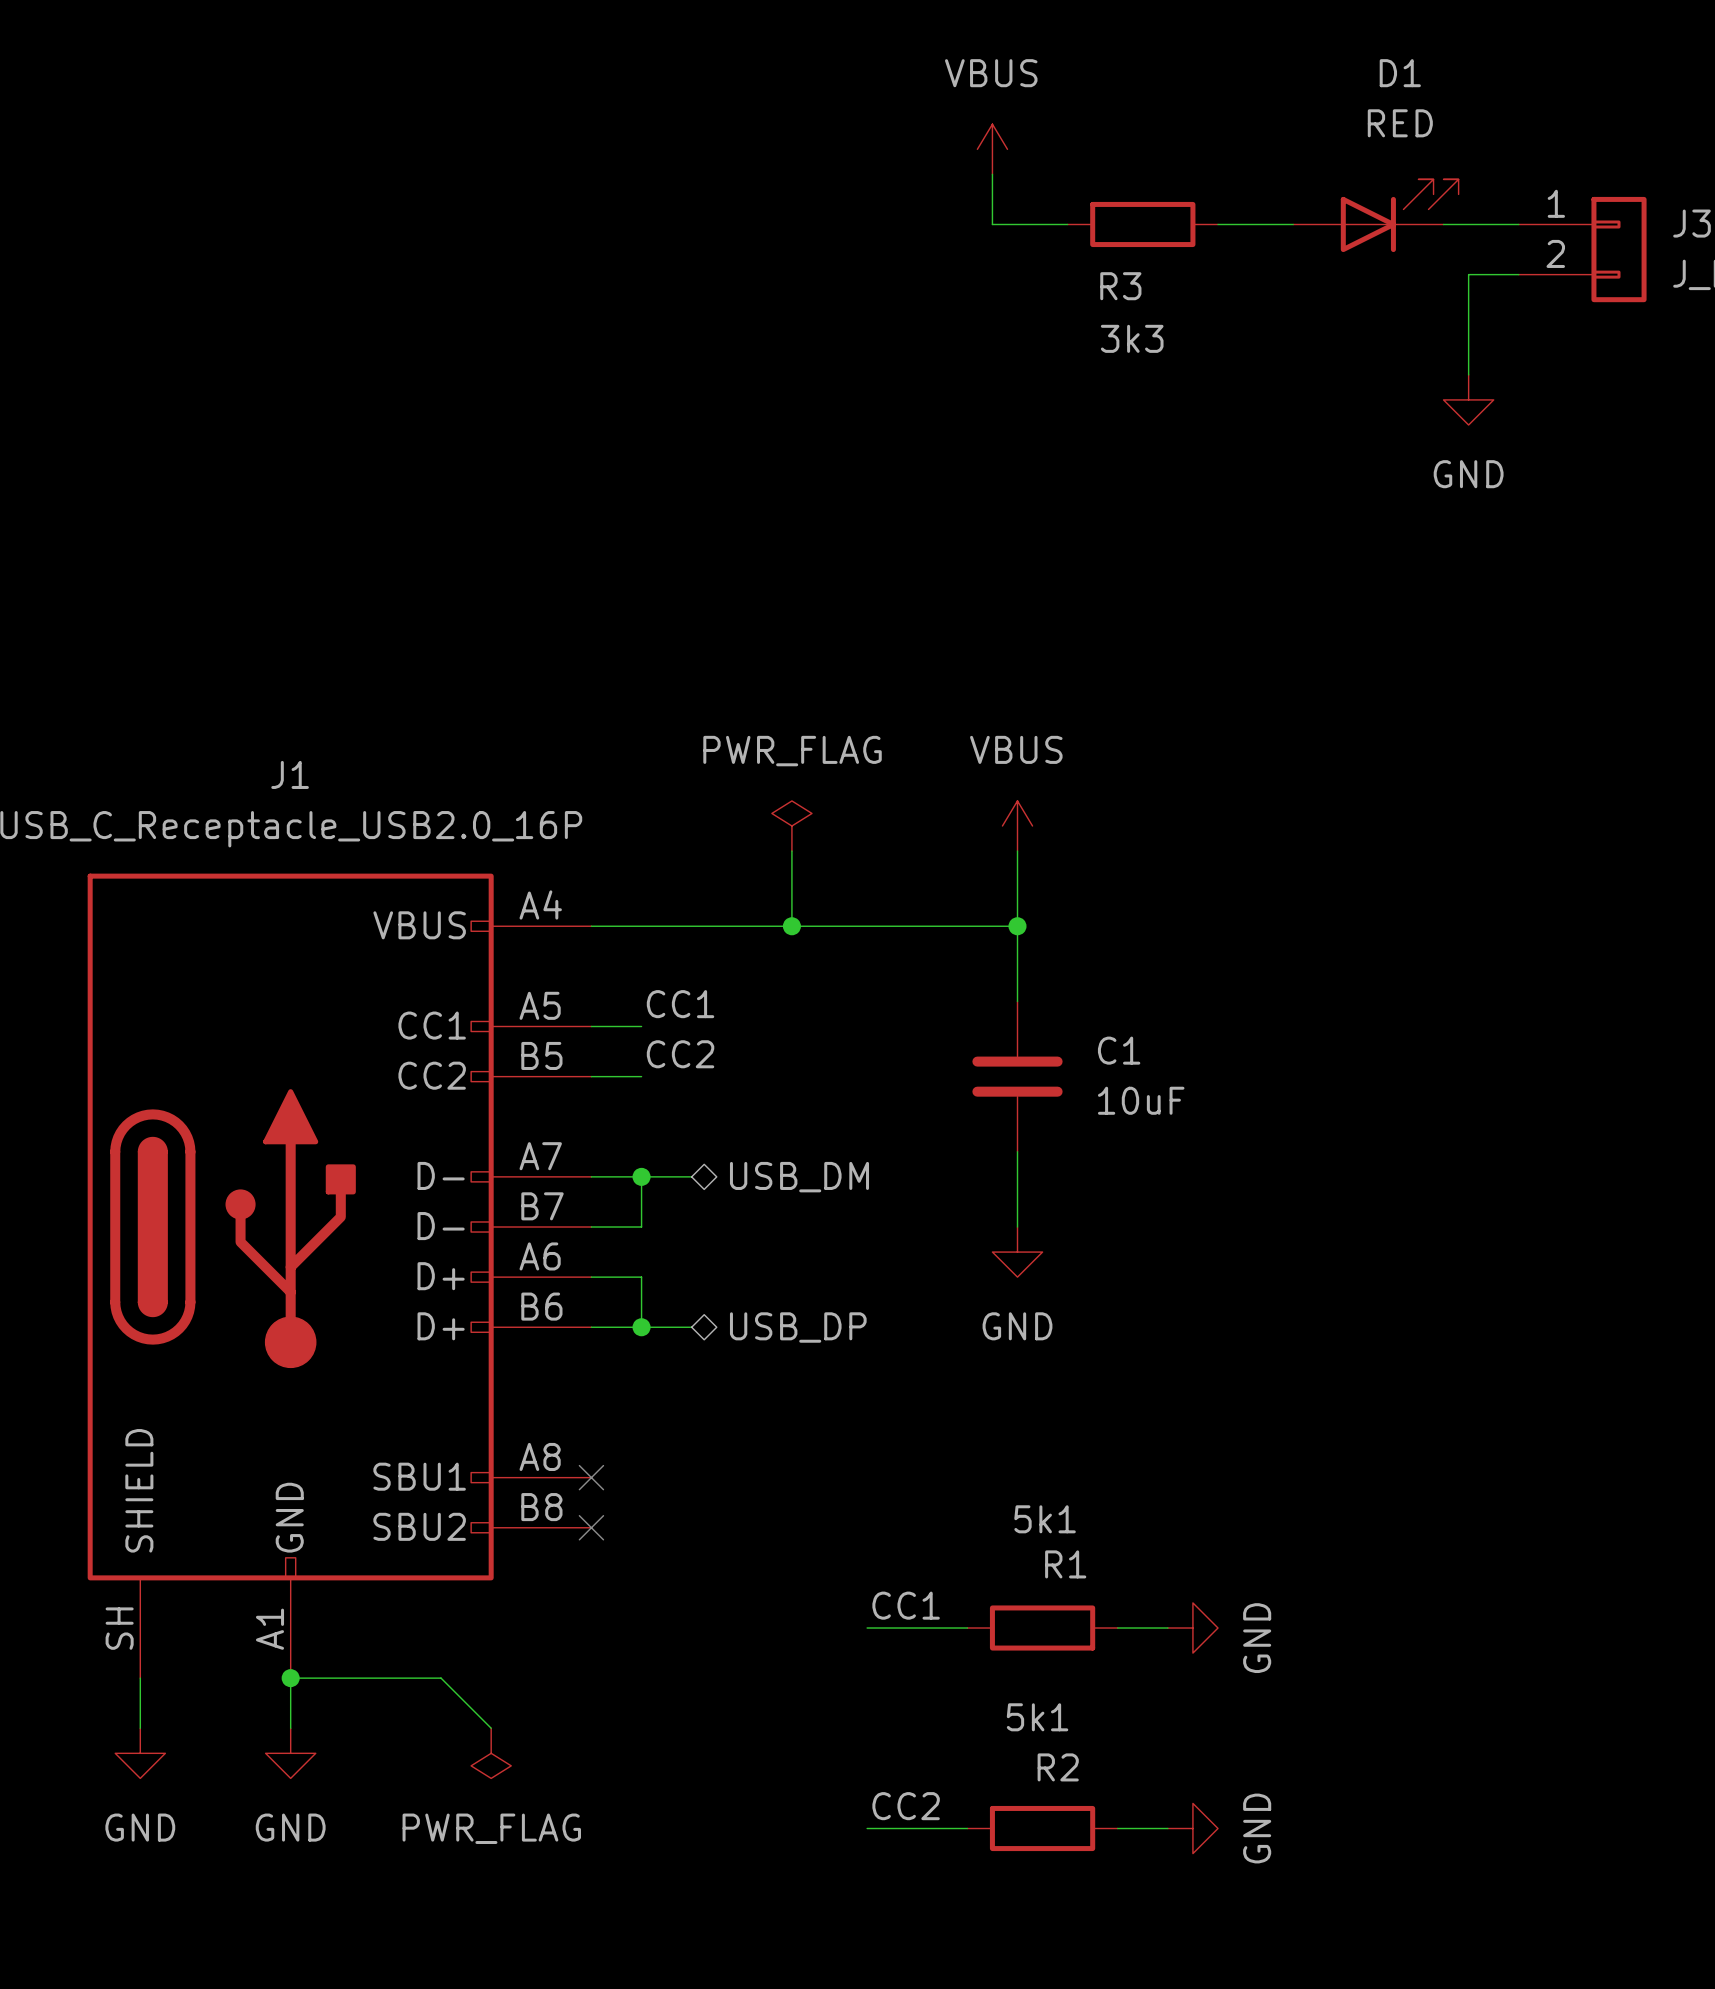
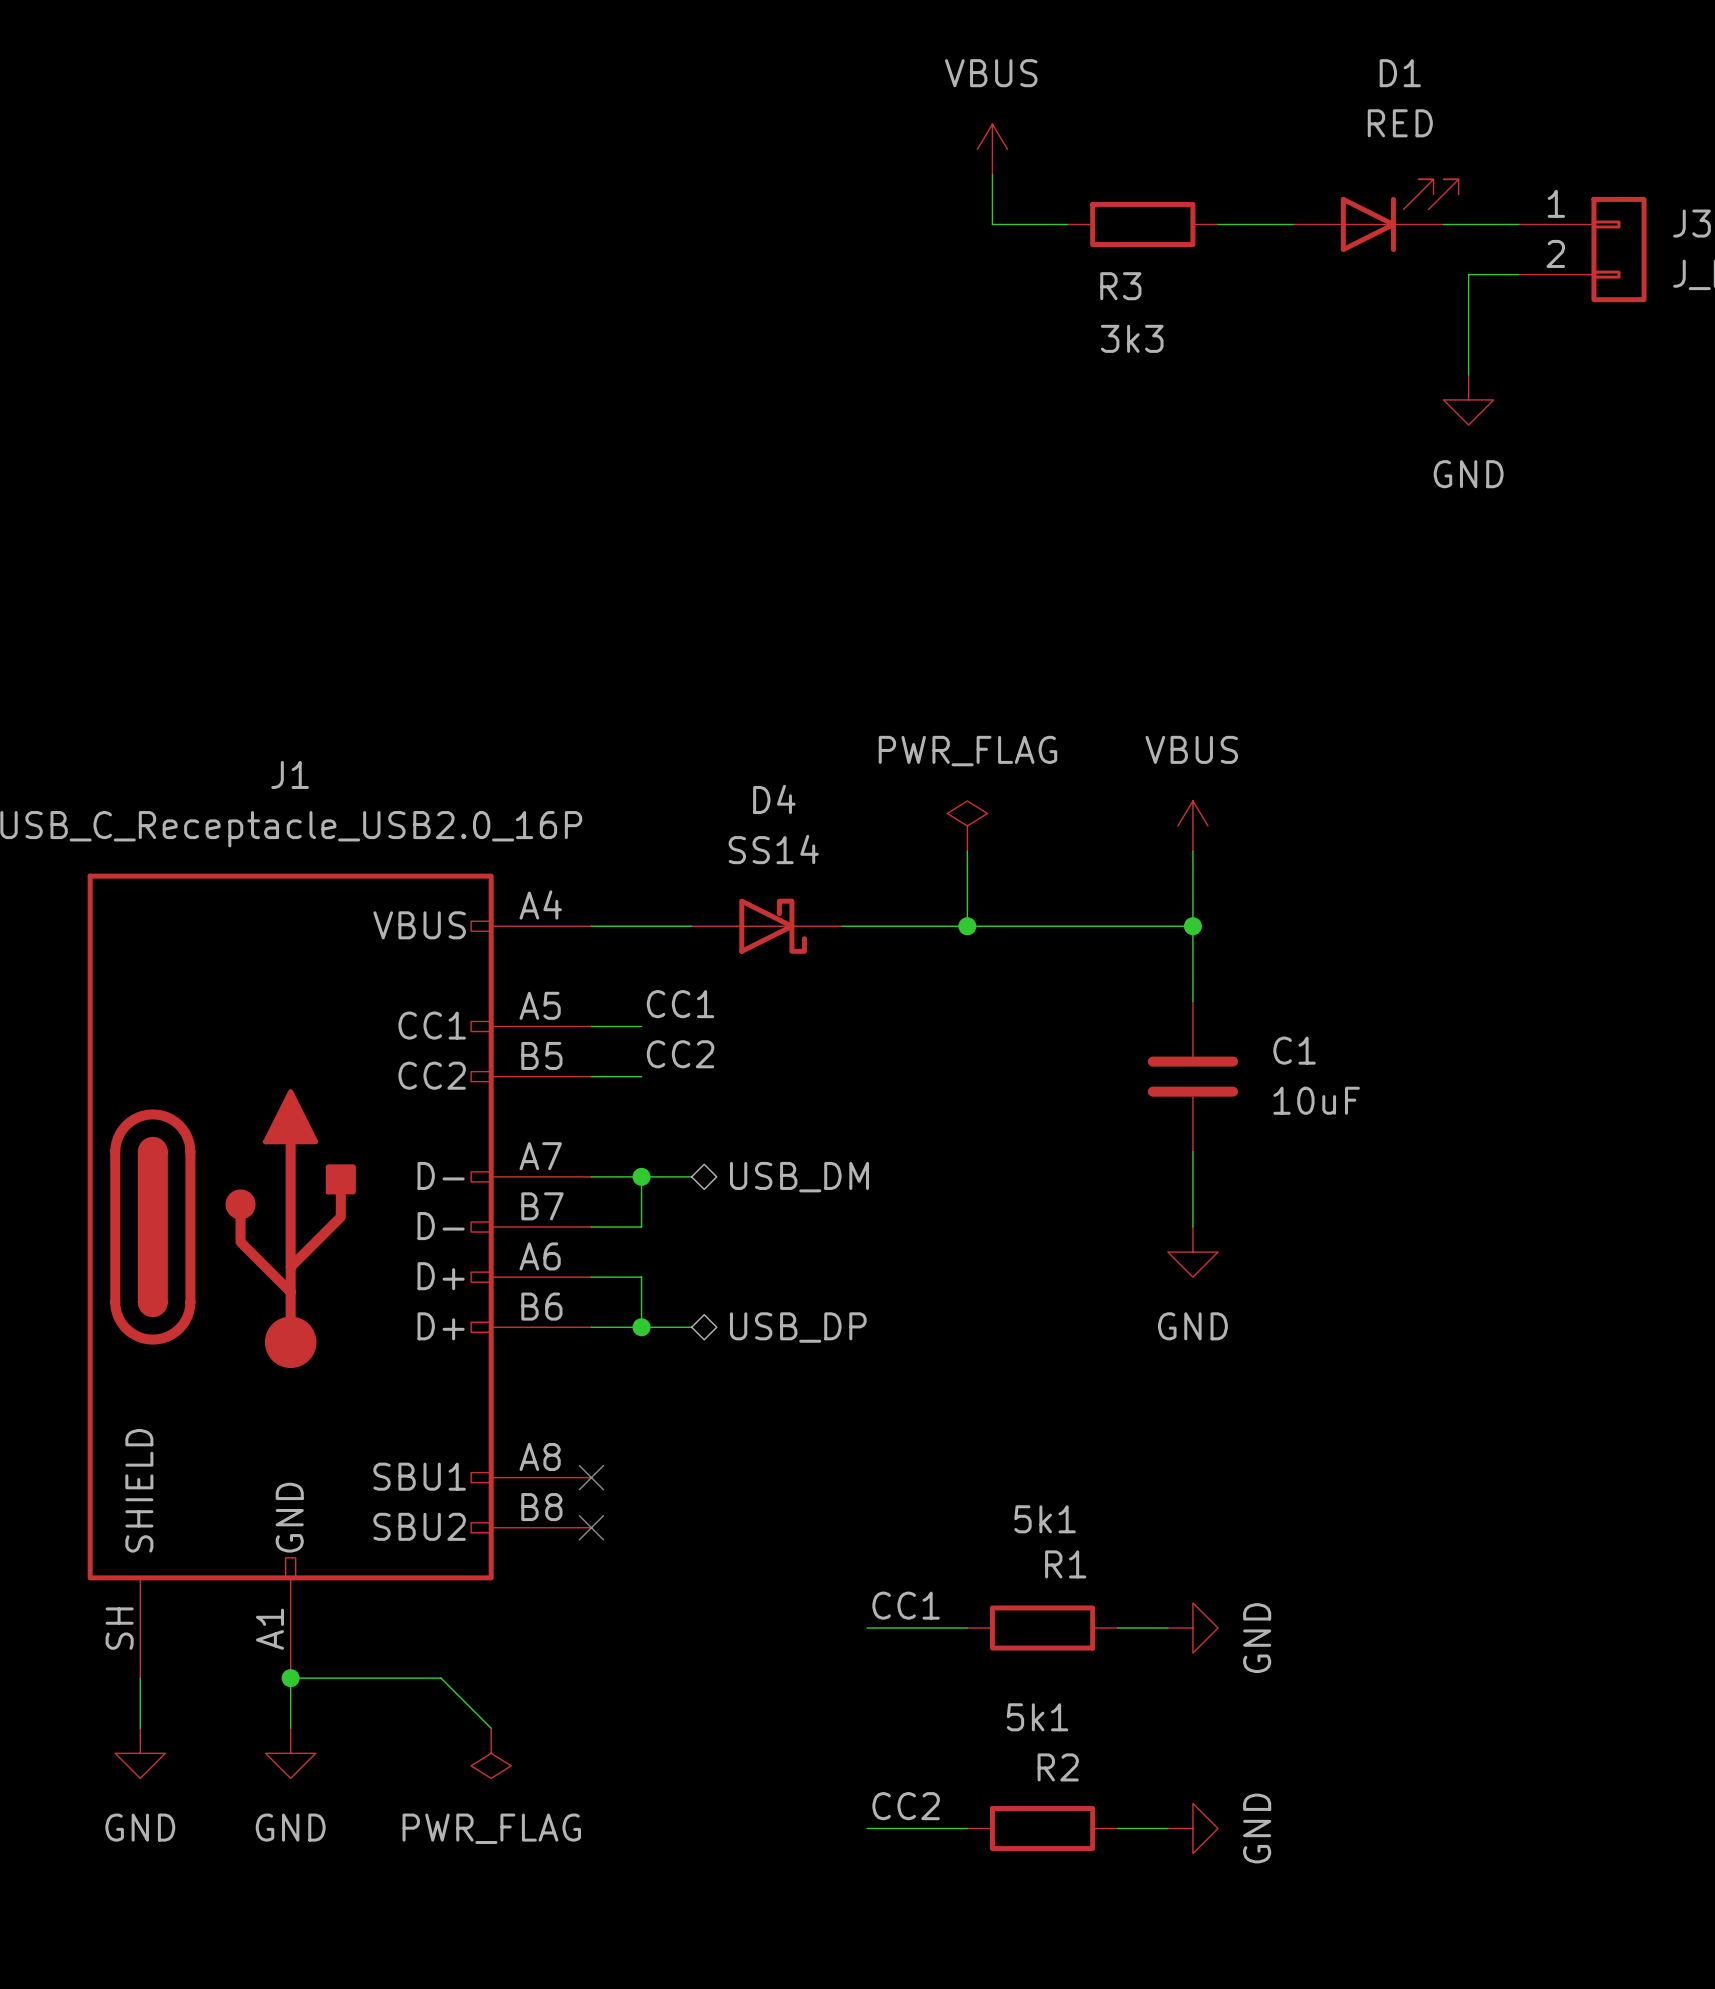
power symbol position: PWR_FLAG (791, 826) -> PWR_FLAG (967, 826)
power symbol position: VBUS (1017, 826) -> VBUS (1192, 826)
wire: (791, 851) (791, 926) -> (967, 851) (967, 926)
wire: (1017, 851) (1017, 1001) -> (1192, 851) (1192, 1001)
D4: none -> SS14 (766, 926)
junction: (791, 926) -> none
wire: none -> (1017, 926) (1192, 926)
junction position: (1017, 926) -> (967, 926)
junction: none -> (1192, 926)
C1 position: (1017, 1076) -> (1192, 1076)
wire: (1017, 1151) (1017, 1227) -> (1192, 1151) (1192, 1227)
power symbol position: GND (1017, 1252) -> GND (1192, 1252)

